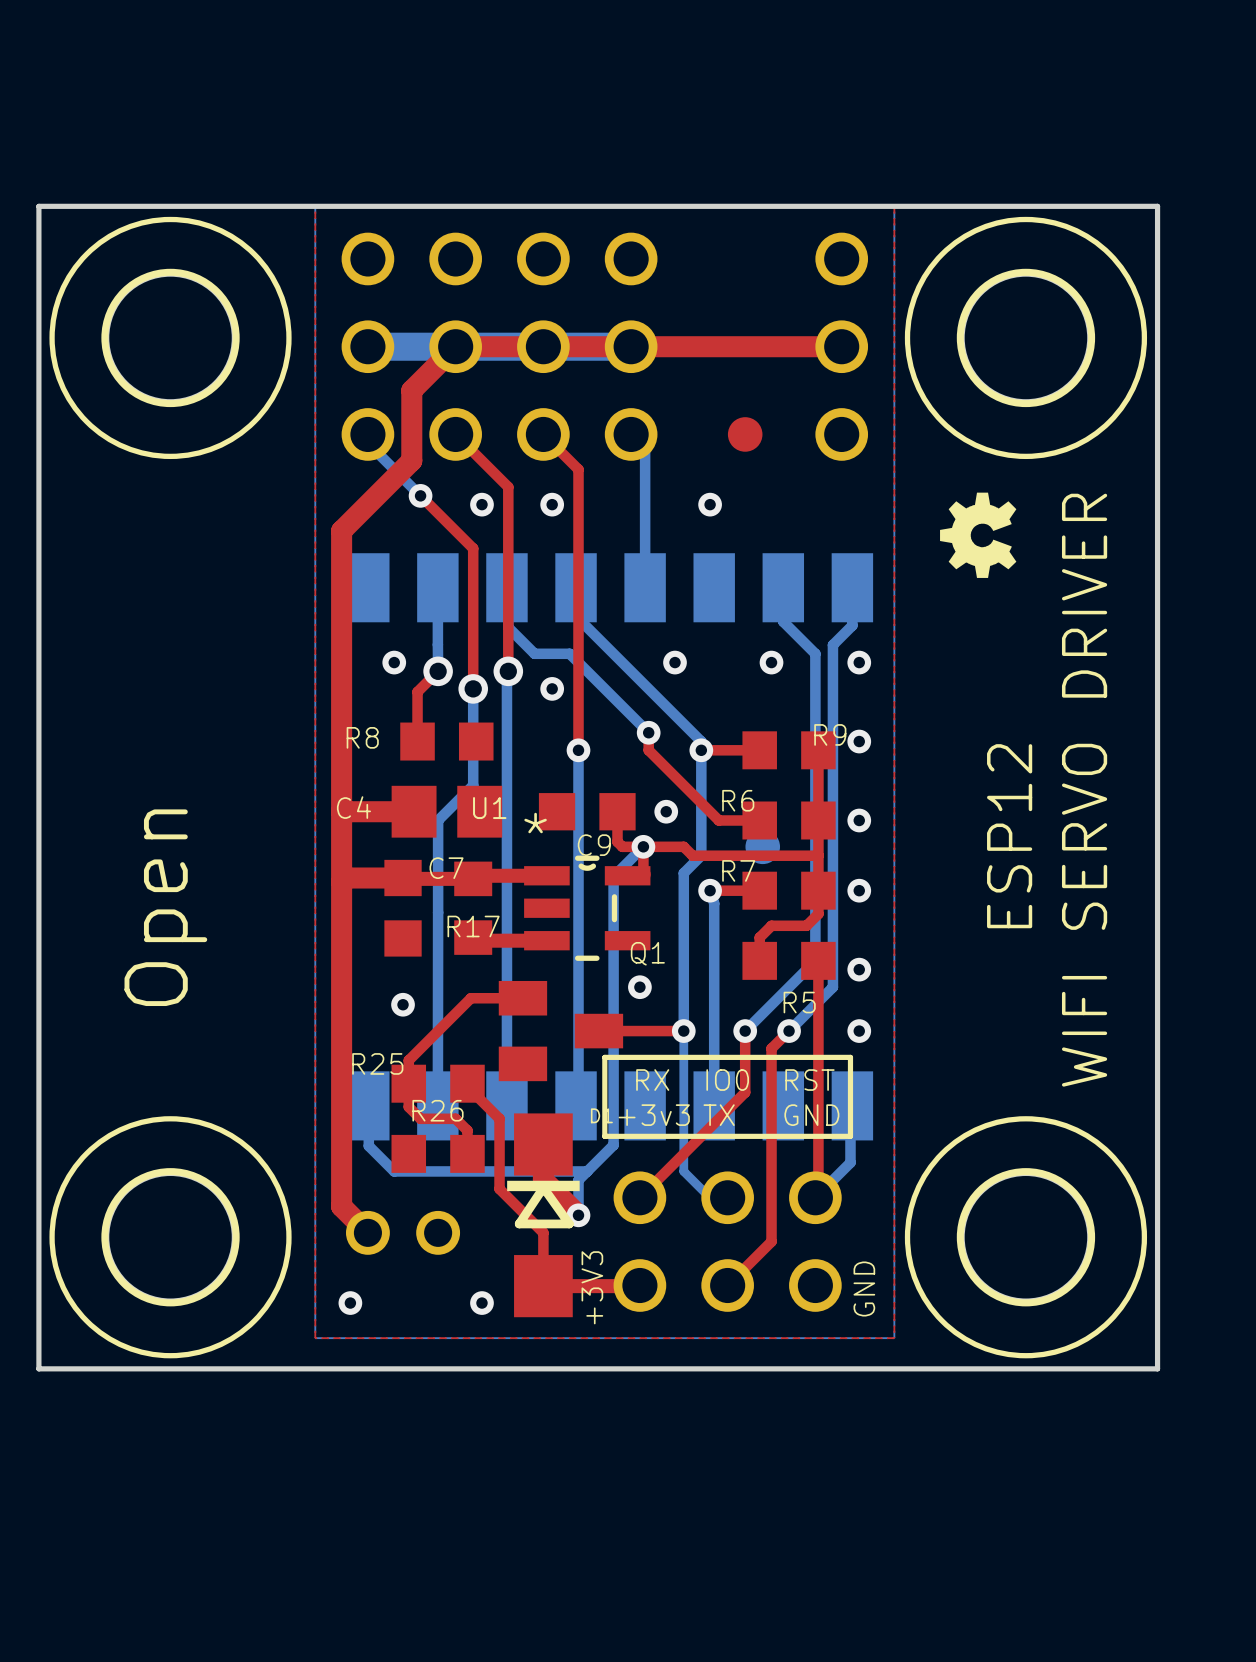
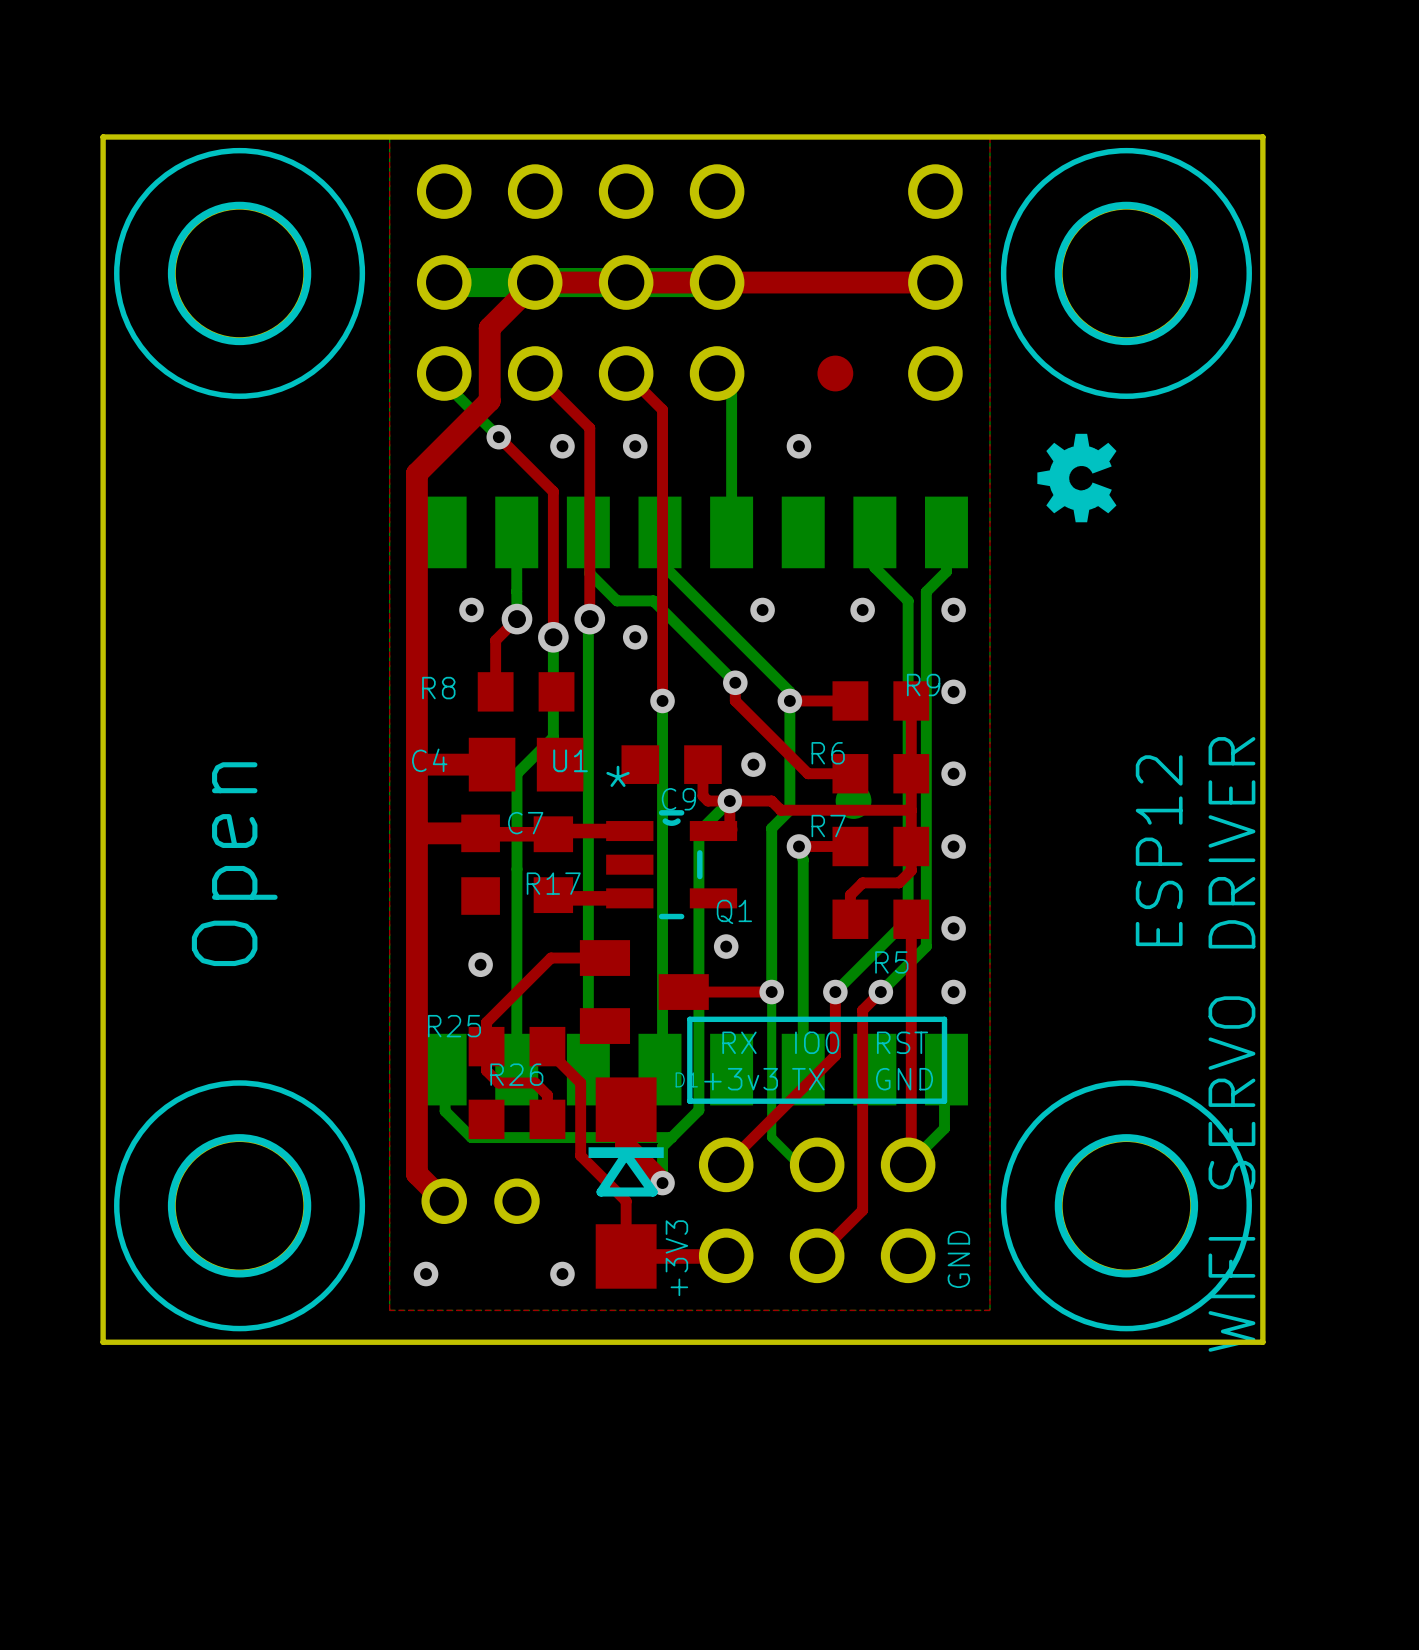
text position: WIFI SERVO DRIVER (1084, 790) -> WIFI SERVO DRIVER (1231, 1044)
text position: ESP12 (1009, 836) -> ESP12 (1159, 850)

